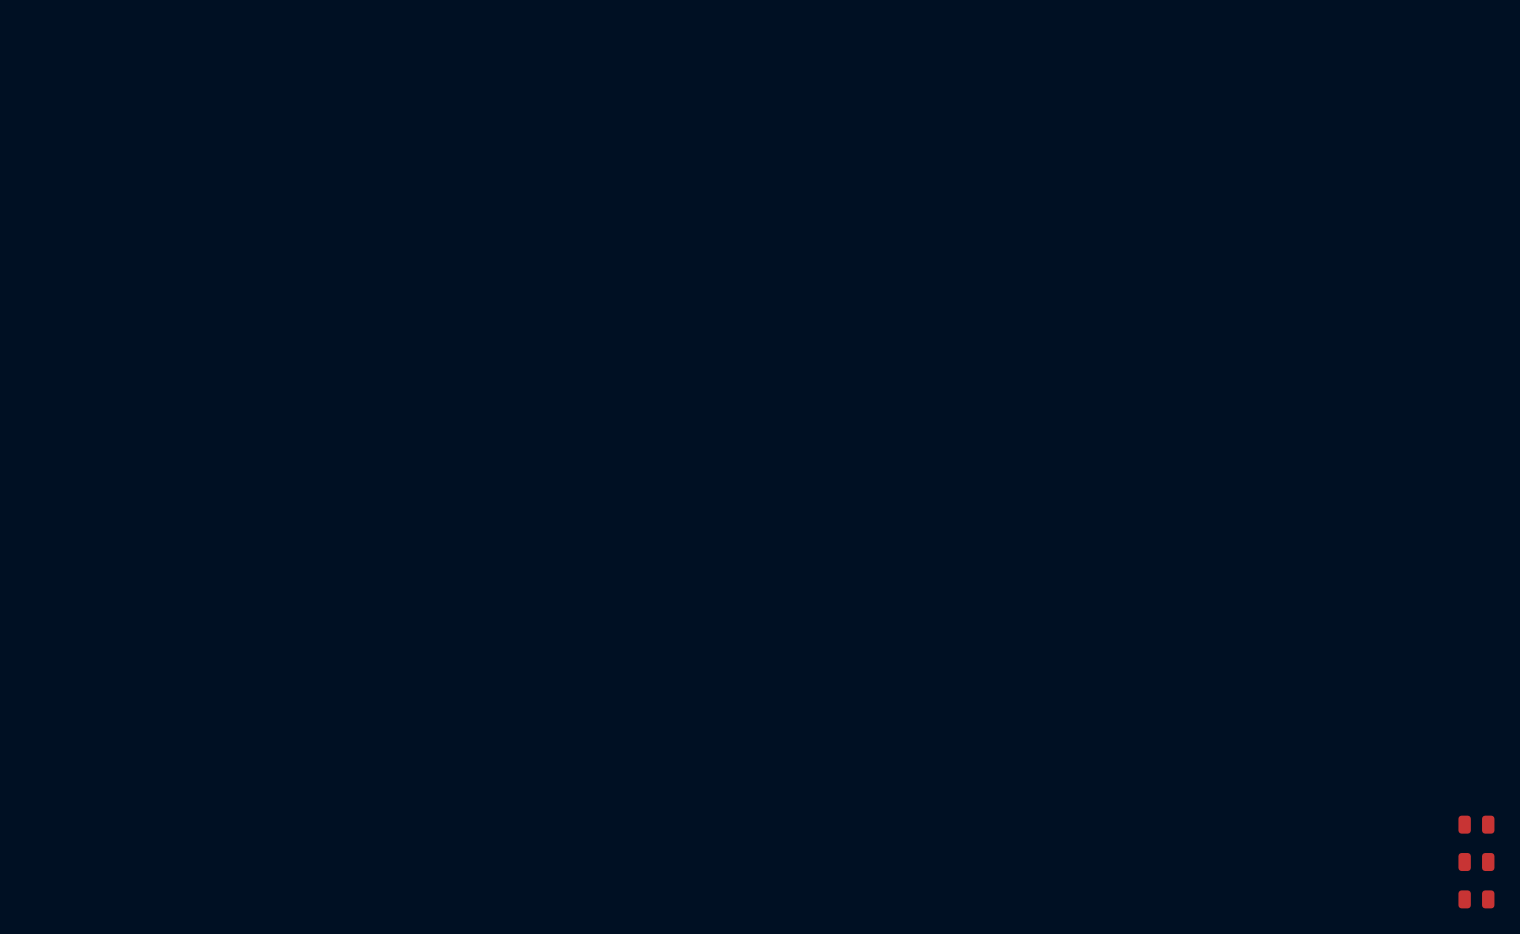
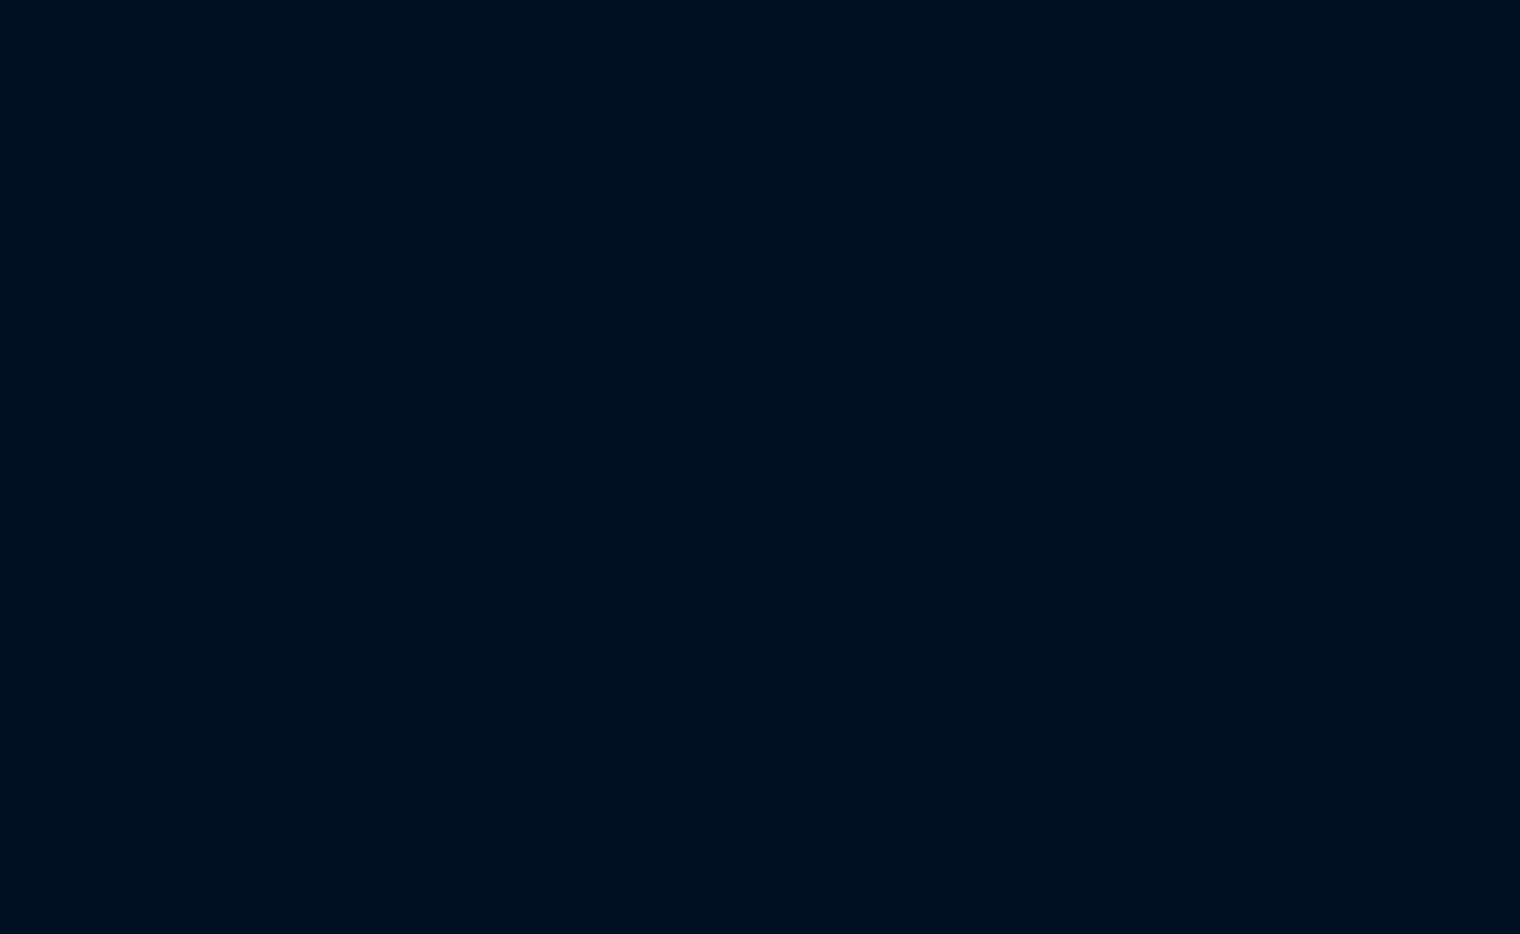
part: (1476, 824) -> none
part: (1476, 862) -> none
part: (1476, 899) -> none

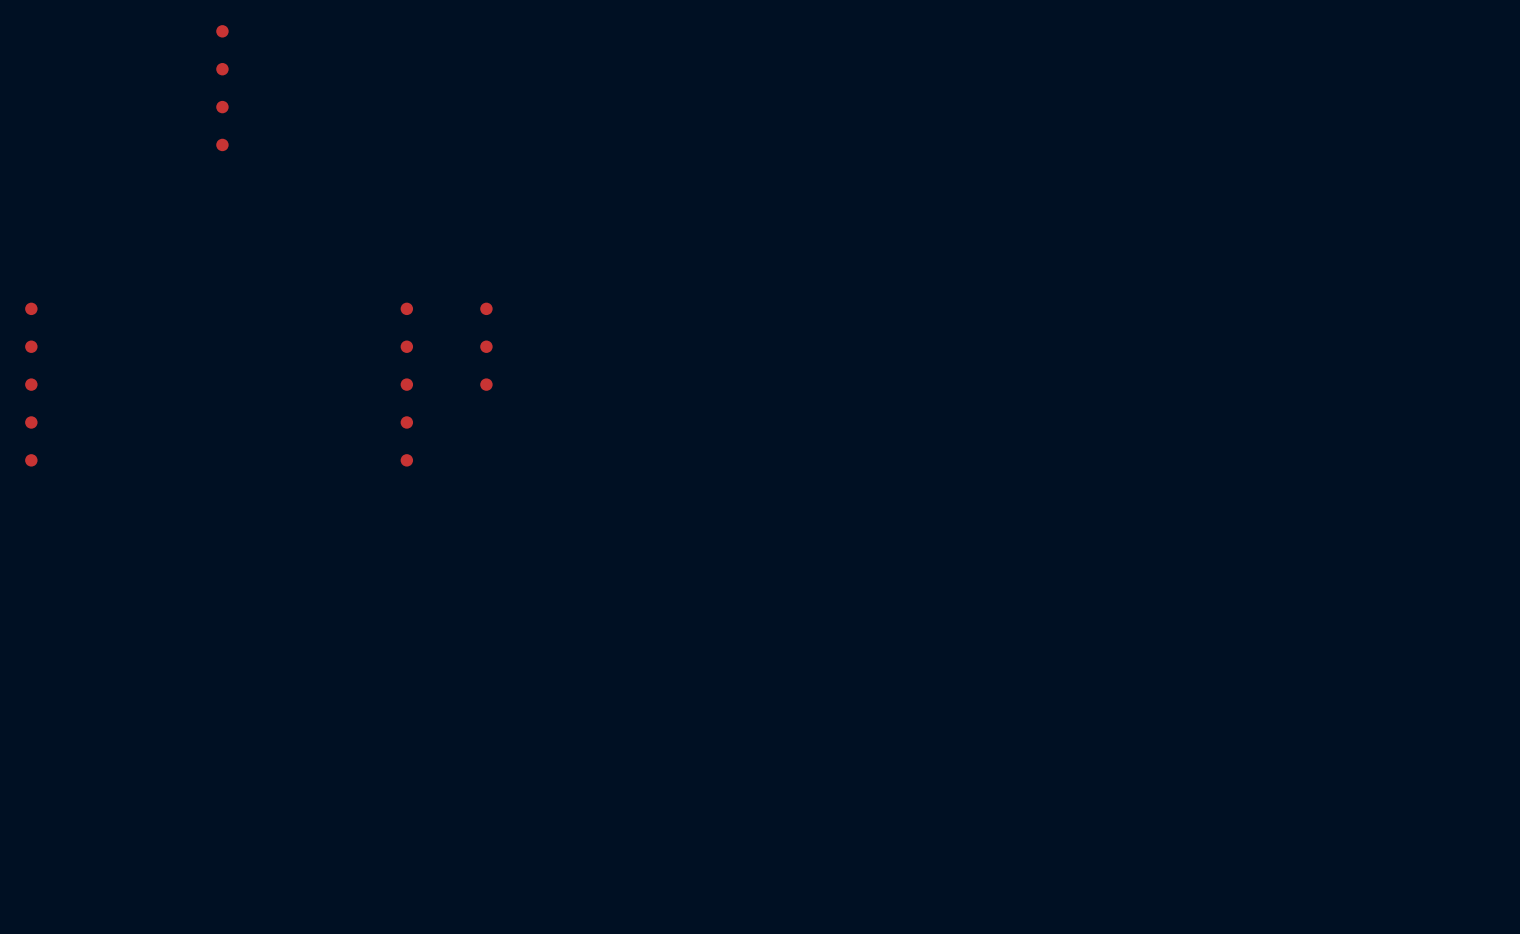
part: none -> (222, 31)
part: none -> (222, 69)
part: none -> (222, 107)
part: none -> (222, 144)
part: none -> (31, 308)
part: none -> (406, 308)
part: none -> (486, 308)
part: none -> (31, 346)
part: none -> (406, 346)
part: none -> (486, 346)
part: none -> (31, 384)
part: none -> (406, 384)
part: none -> (486, 384)
part: none -> (31, 422)
part: none -> (406, 422)
part: none -> (31, 460)
part: none -> (406, 460)

